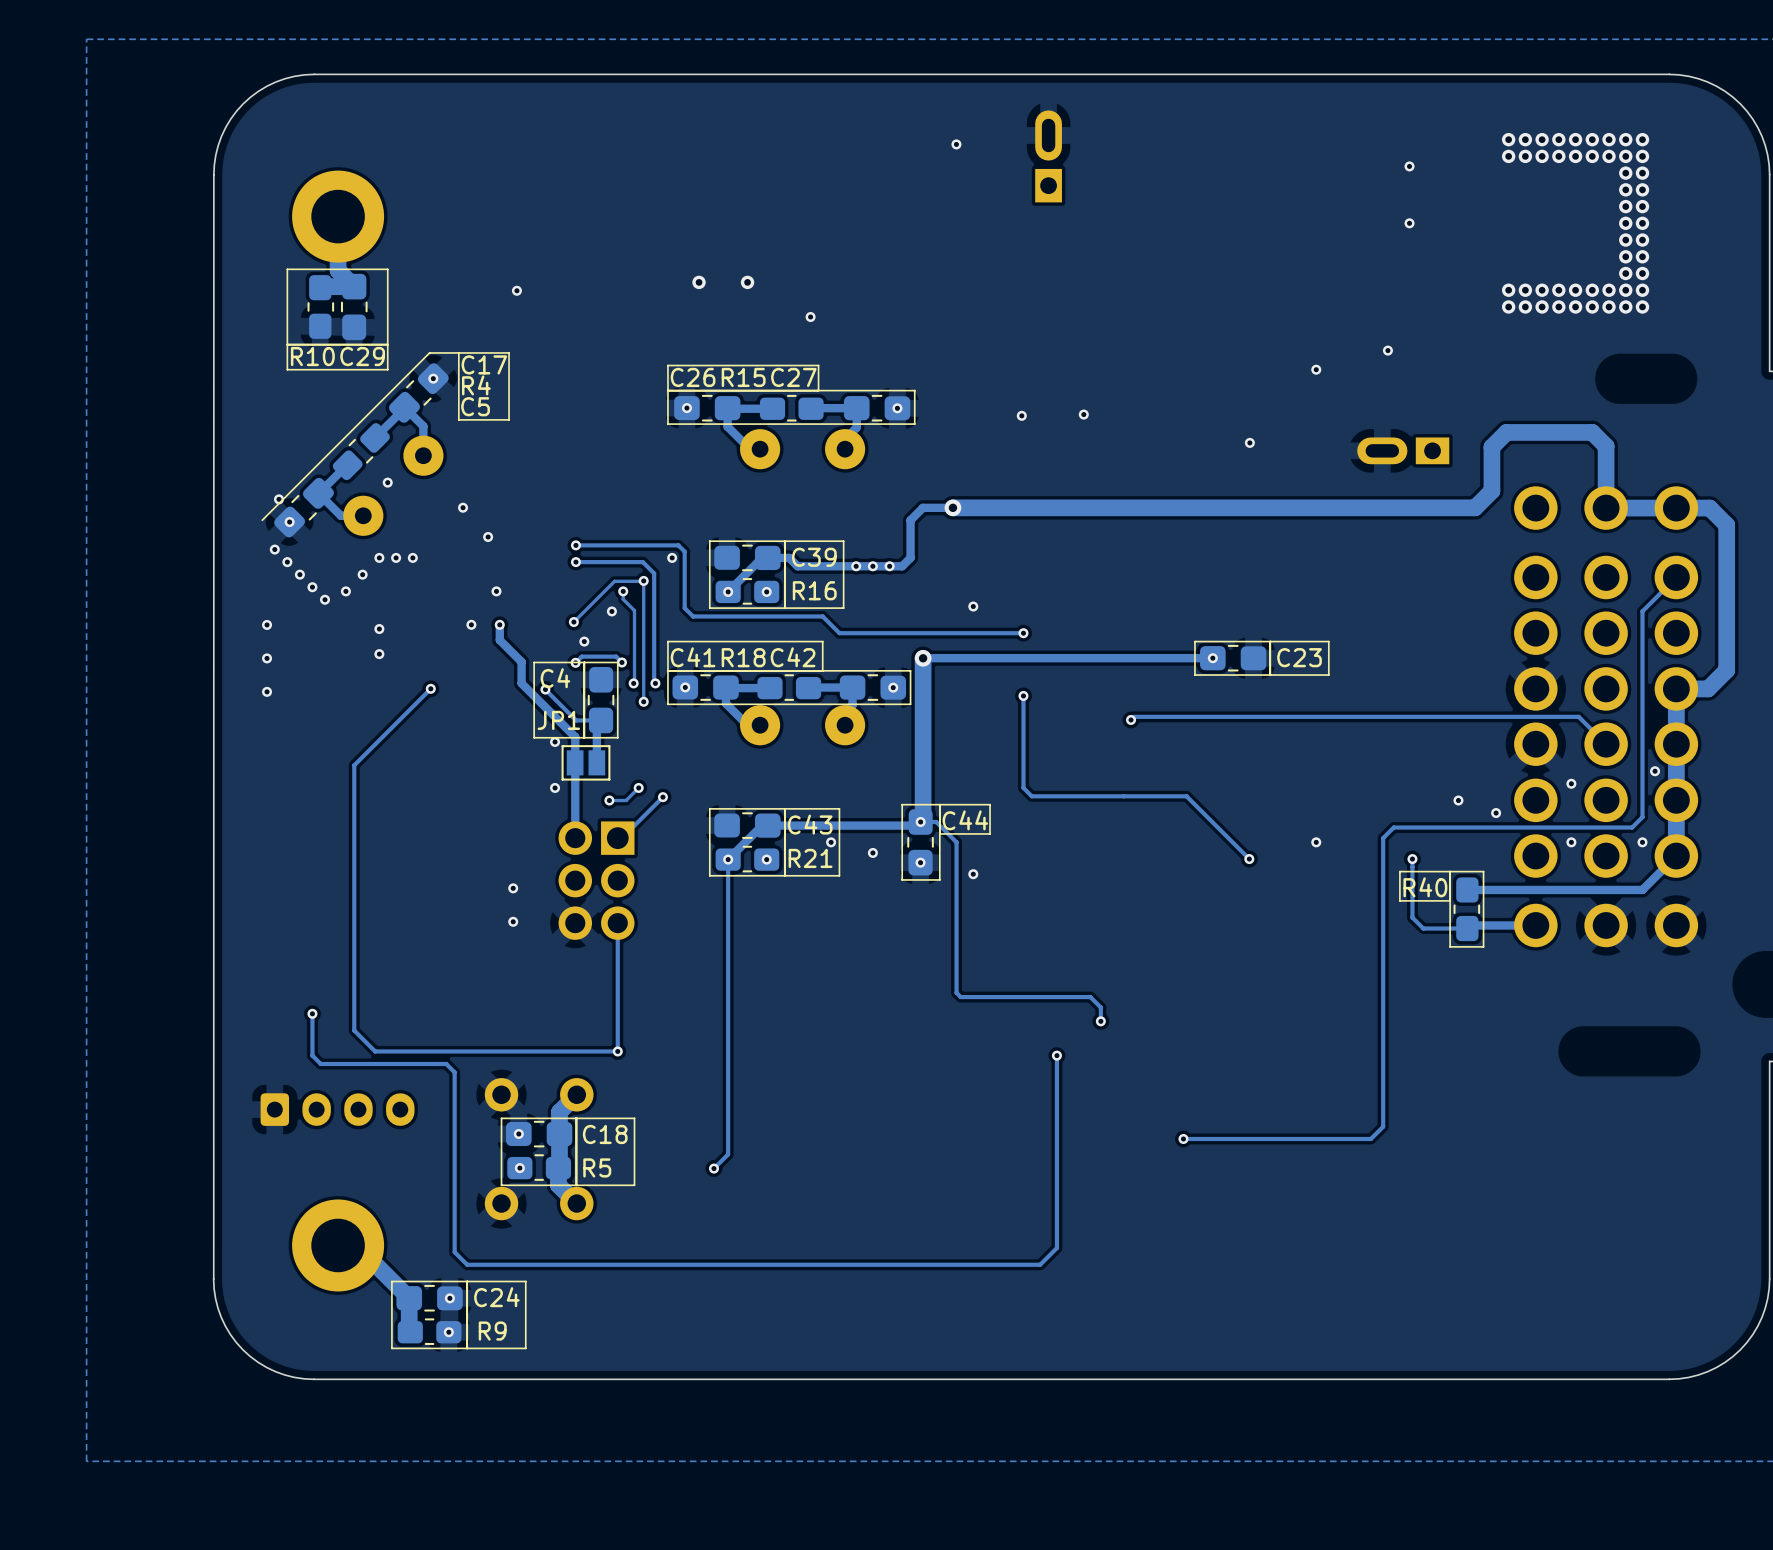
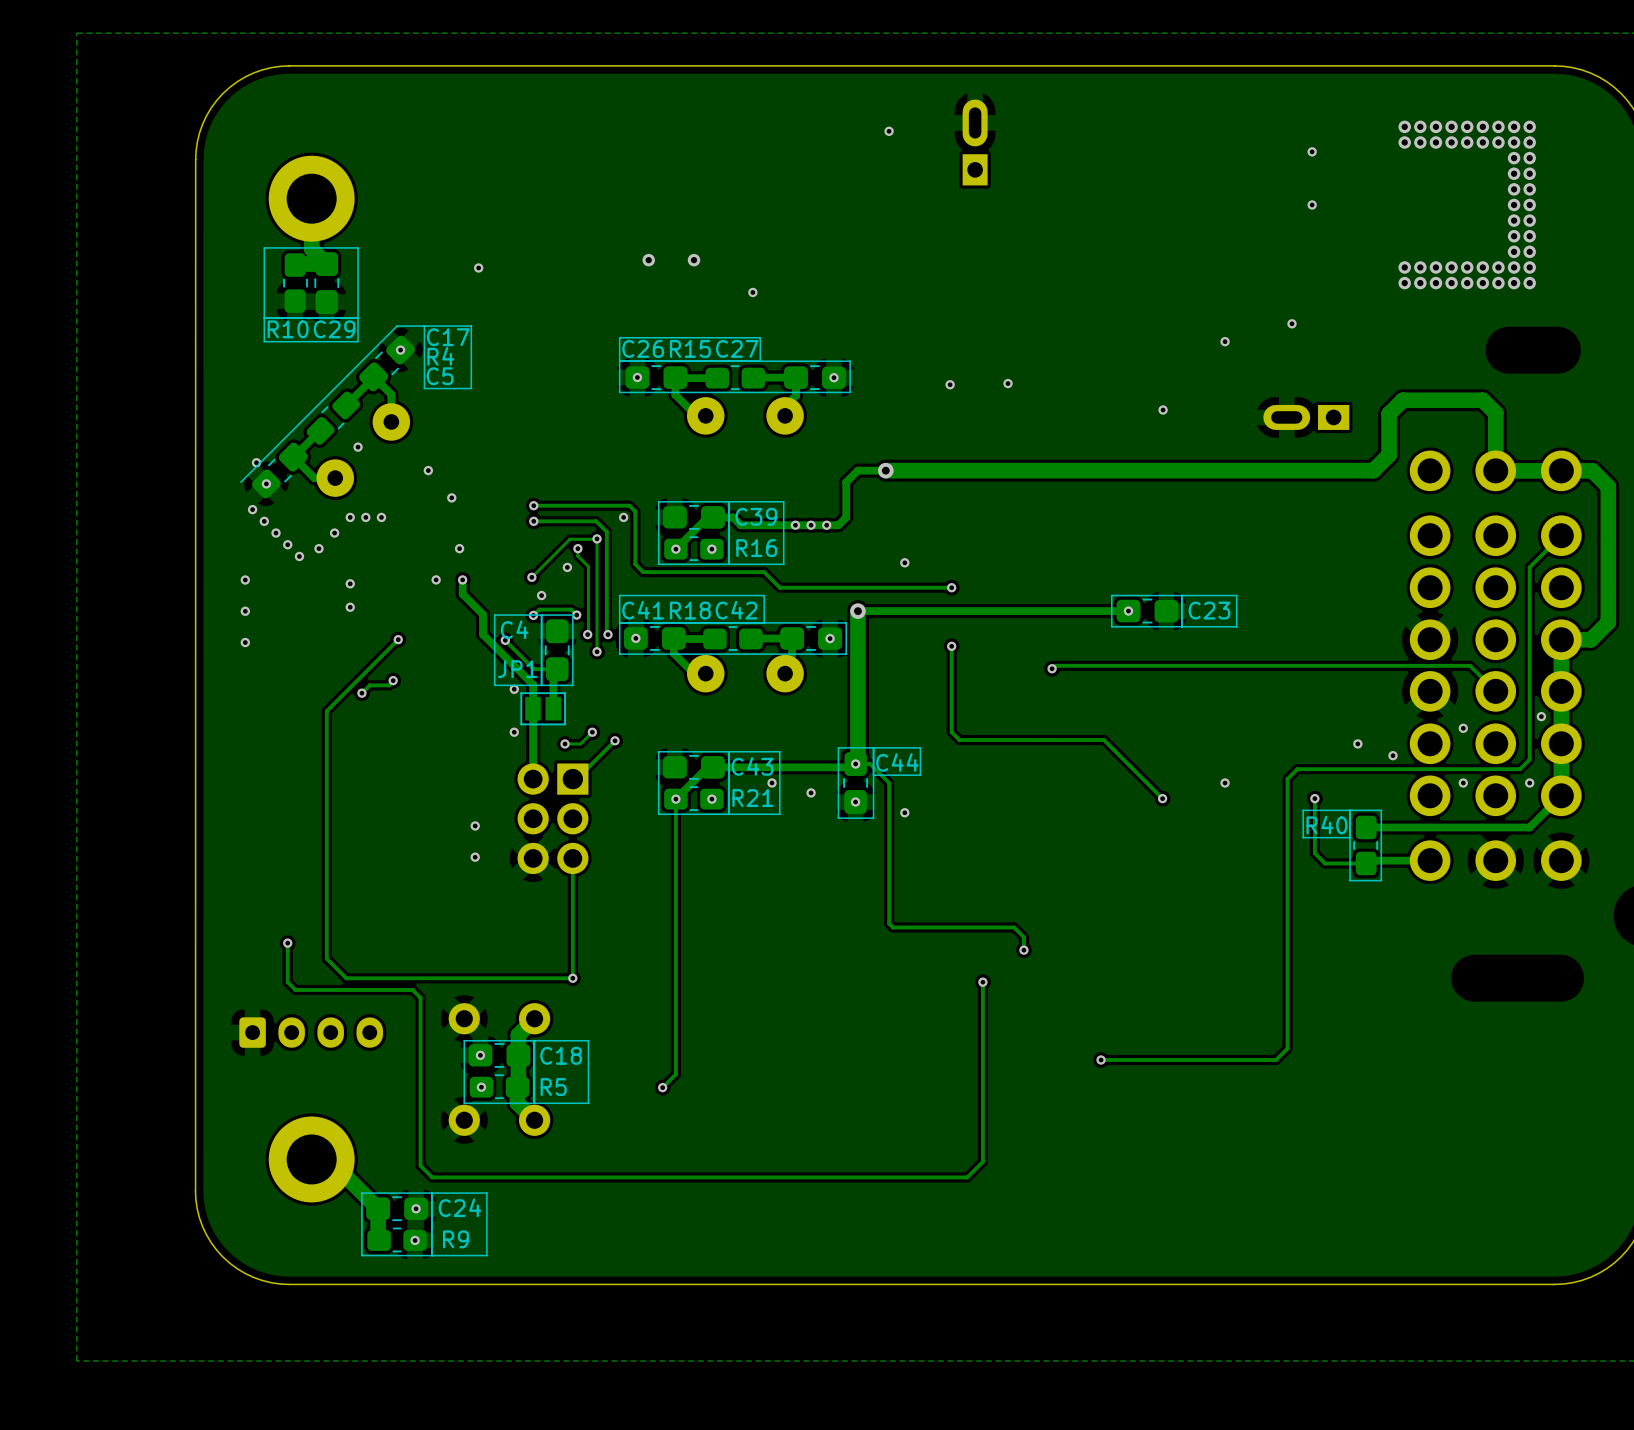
track: none -> (393, 680) (389, 685) (369, 685) (361, 693)
via: none -> (393, 680)
via: none -> (361, 693)

